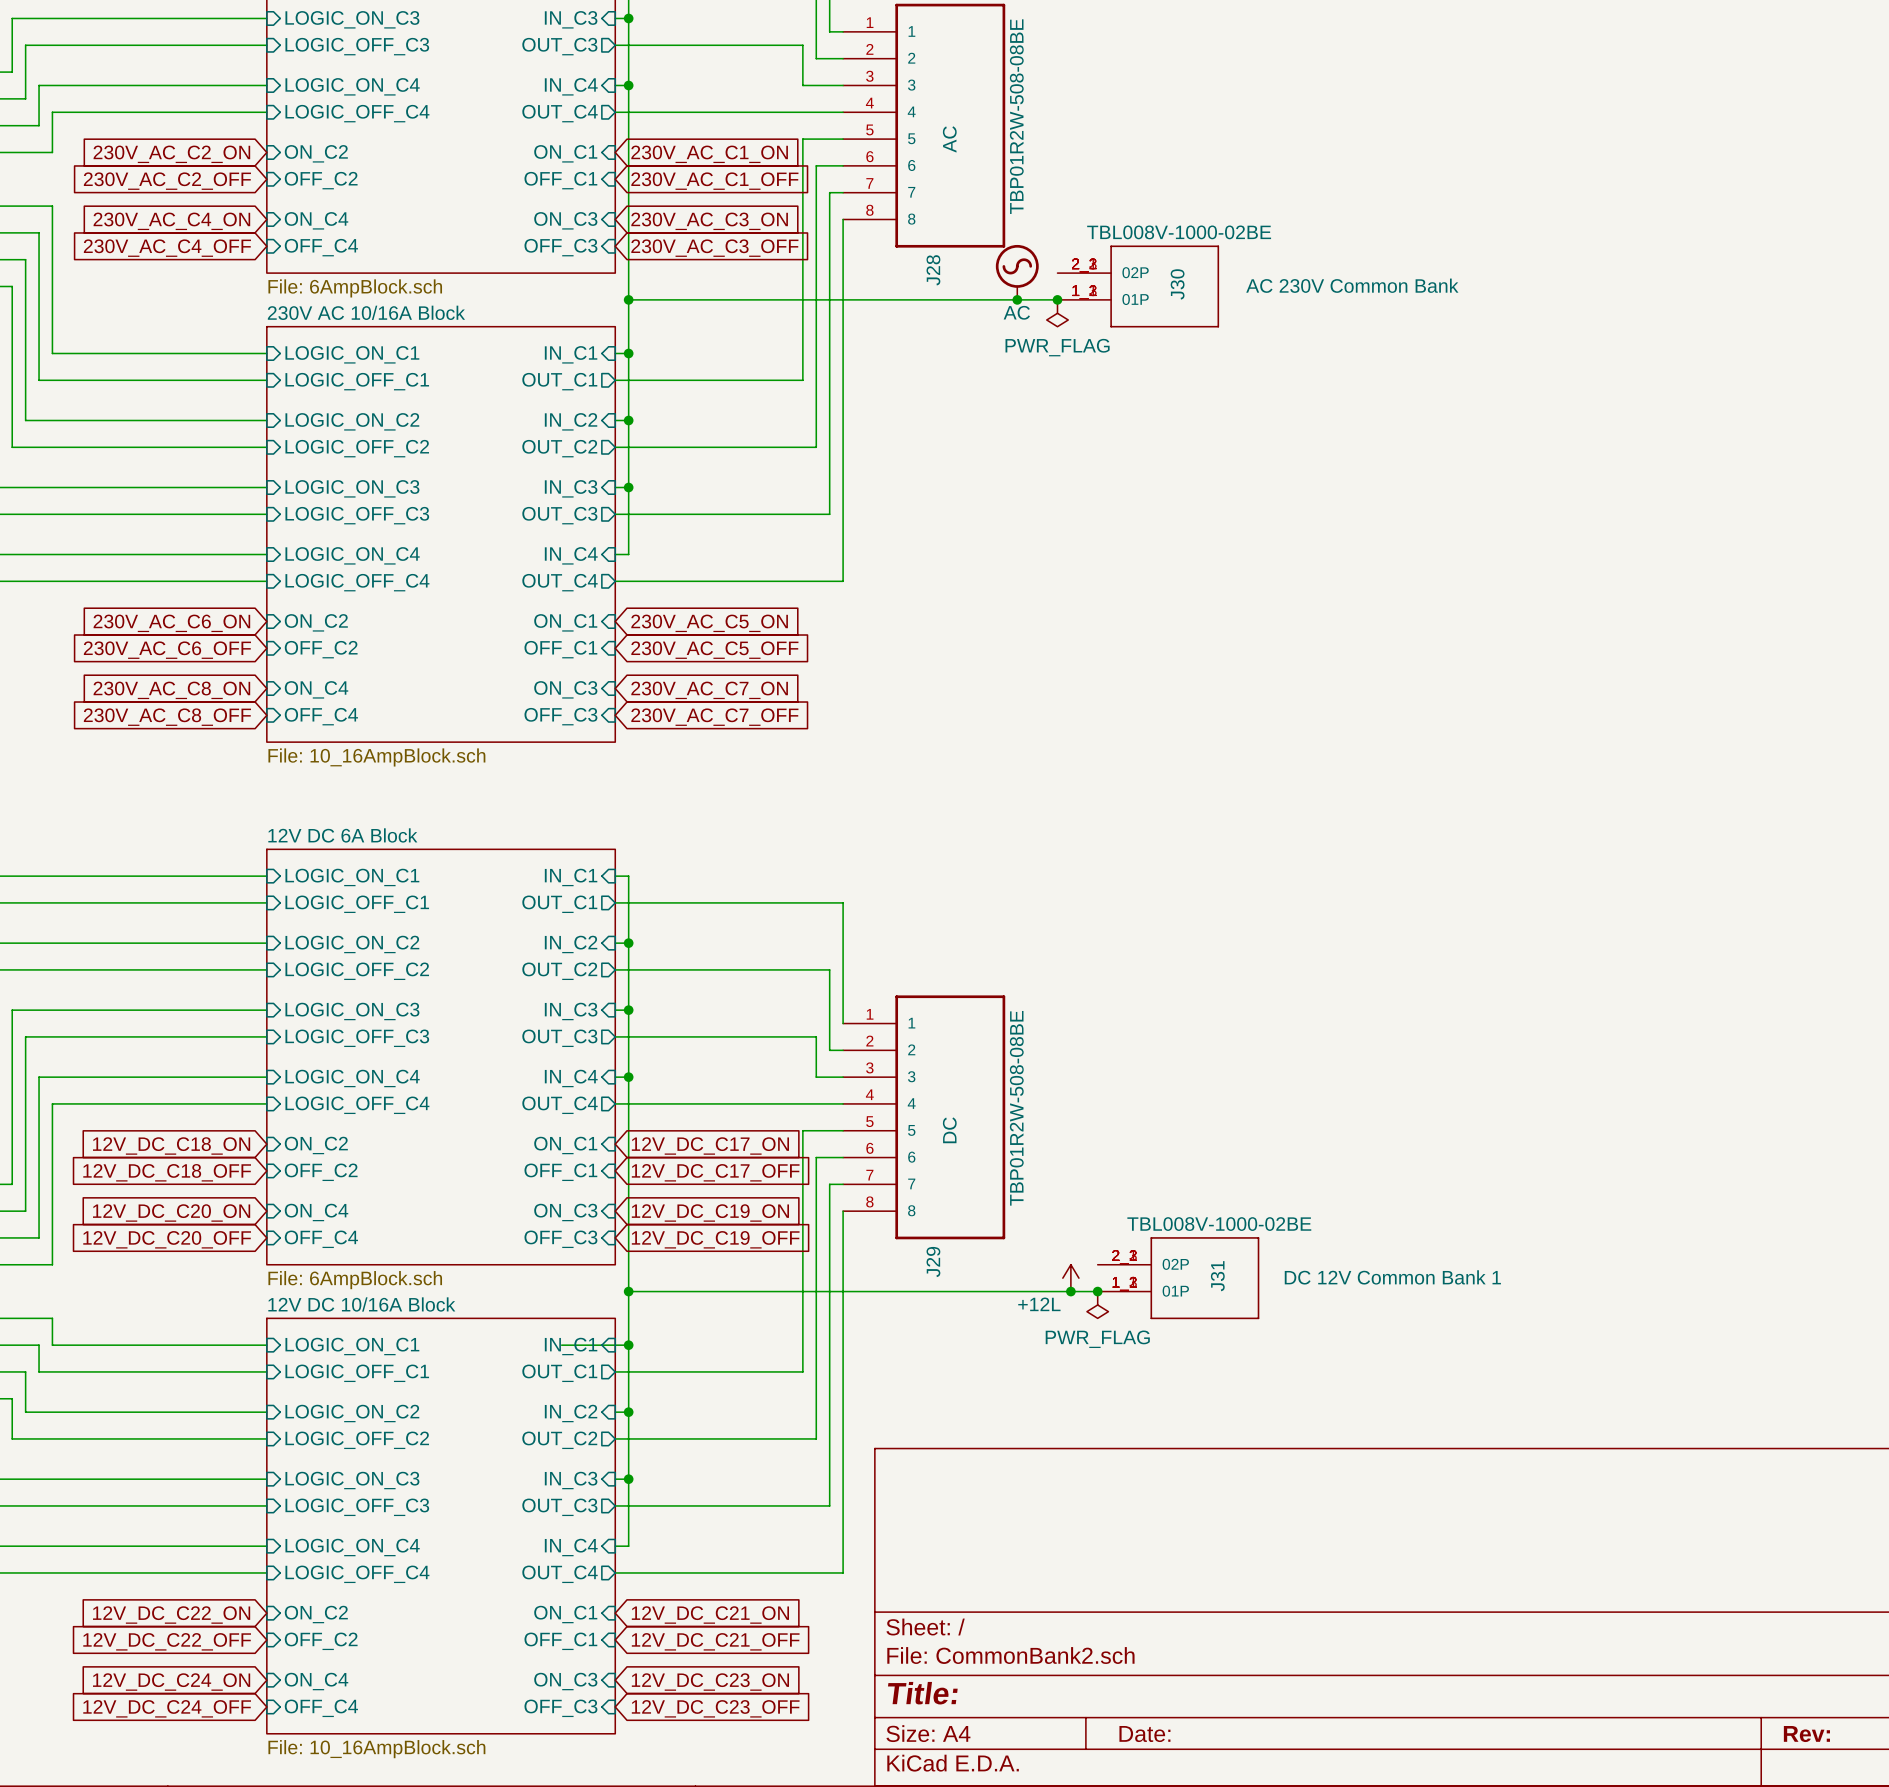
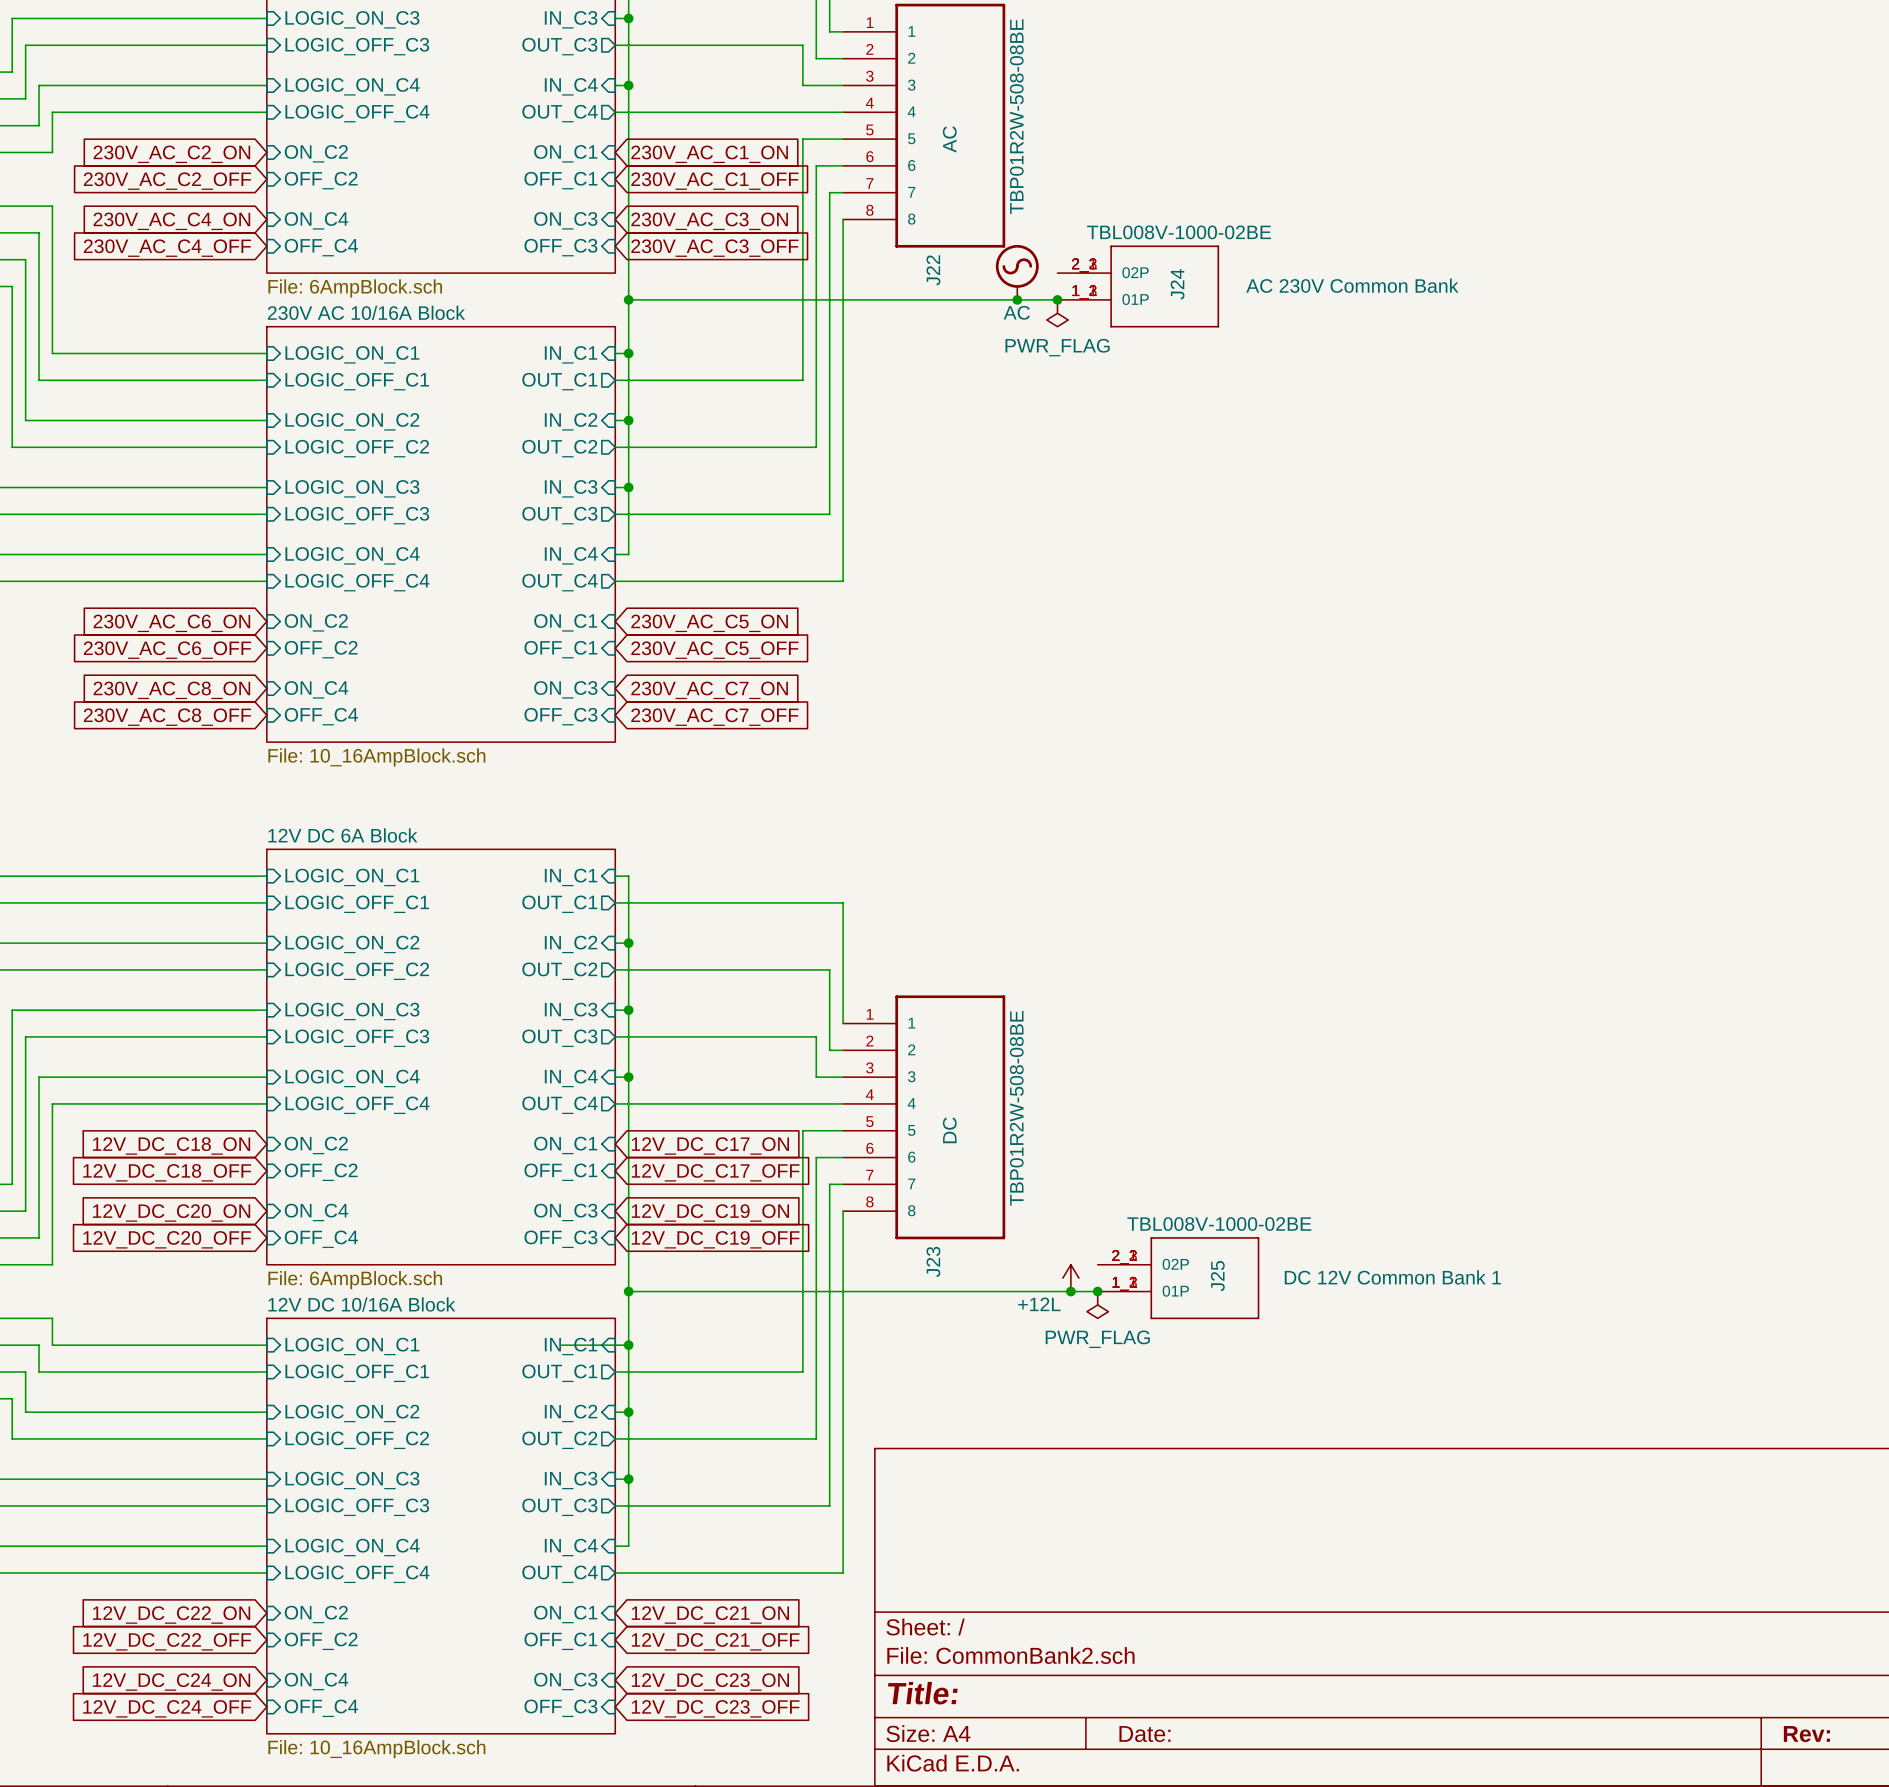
J28 name: J28 (933, 270) -> J22 (933, 270)
J30 name: J30 (1177, 284) -> J24 (1177, 284)
J29 name: J29 (933, 1262) -> J23 (933, 1261)
J31 name: J31 (1217, 1276) -> J25 (1217, 1276)

